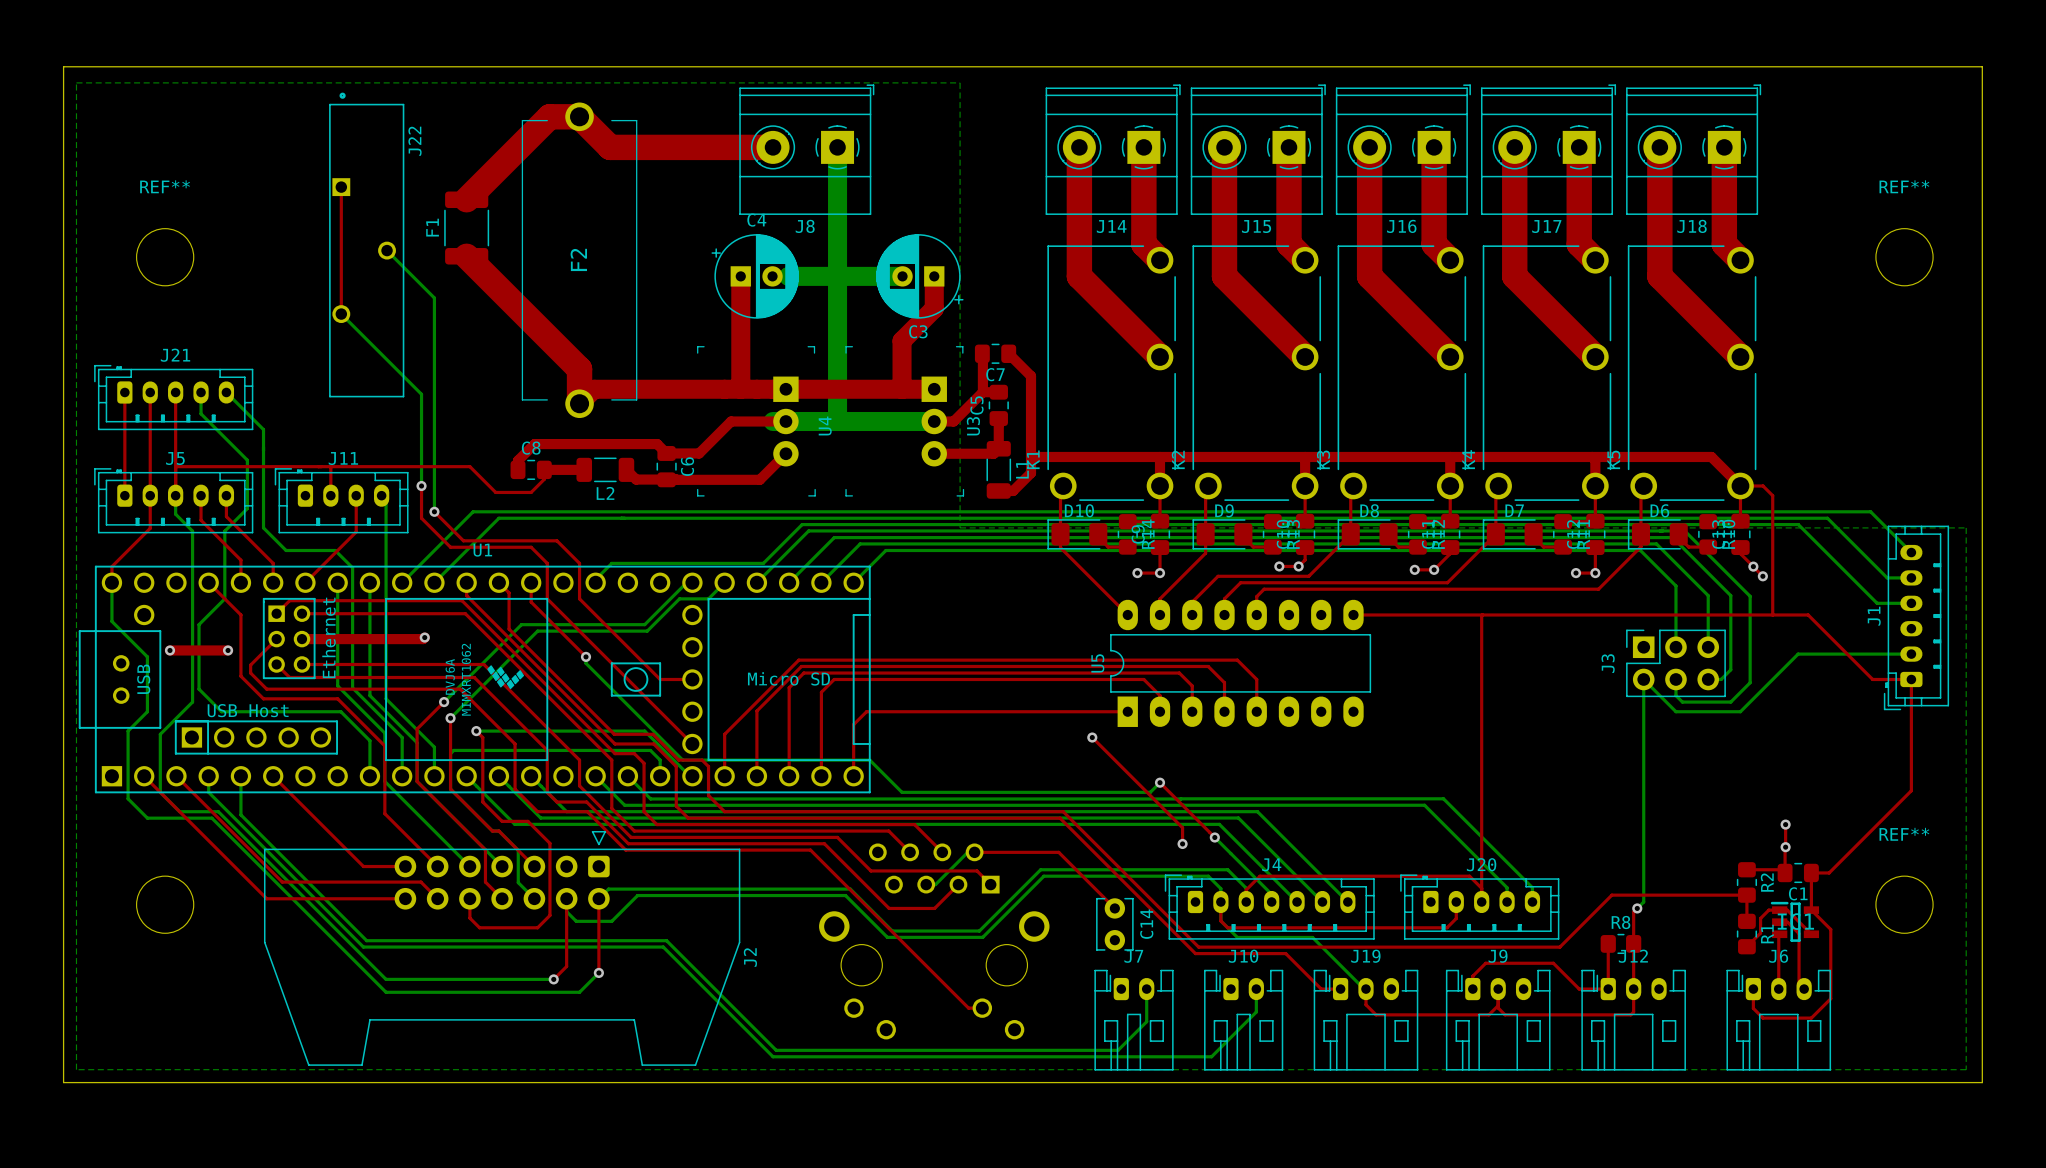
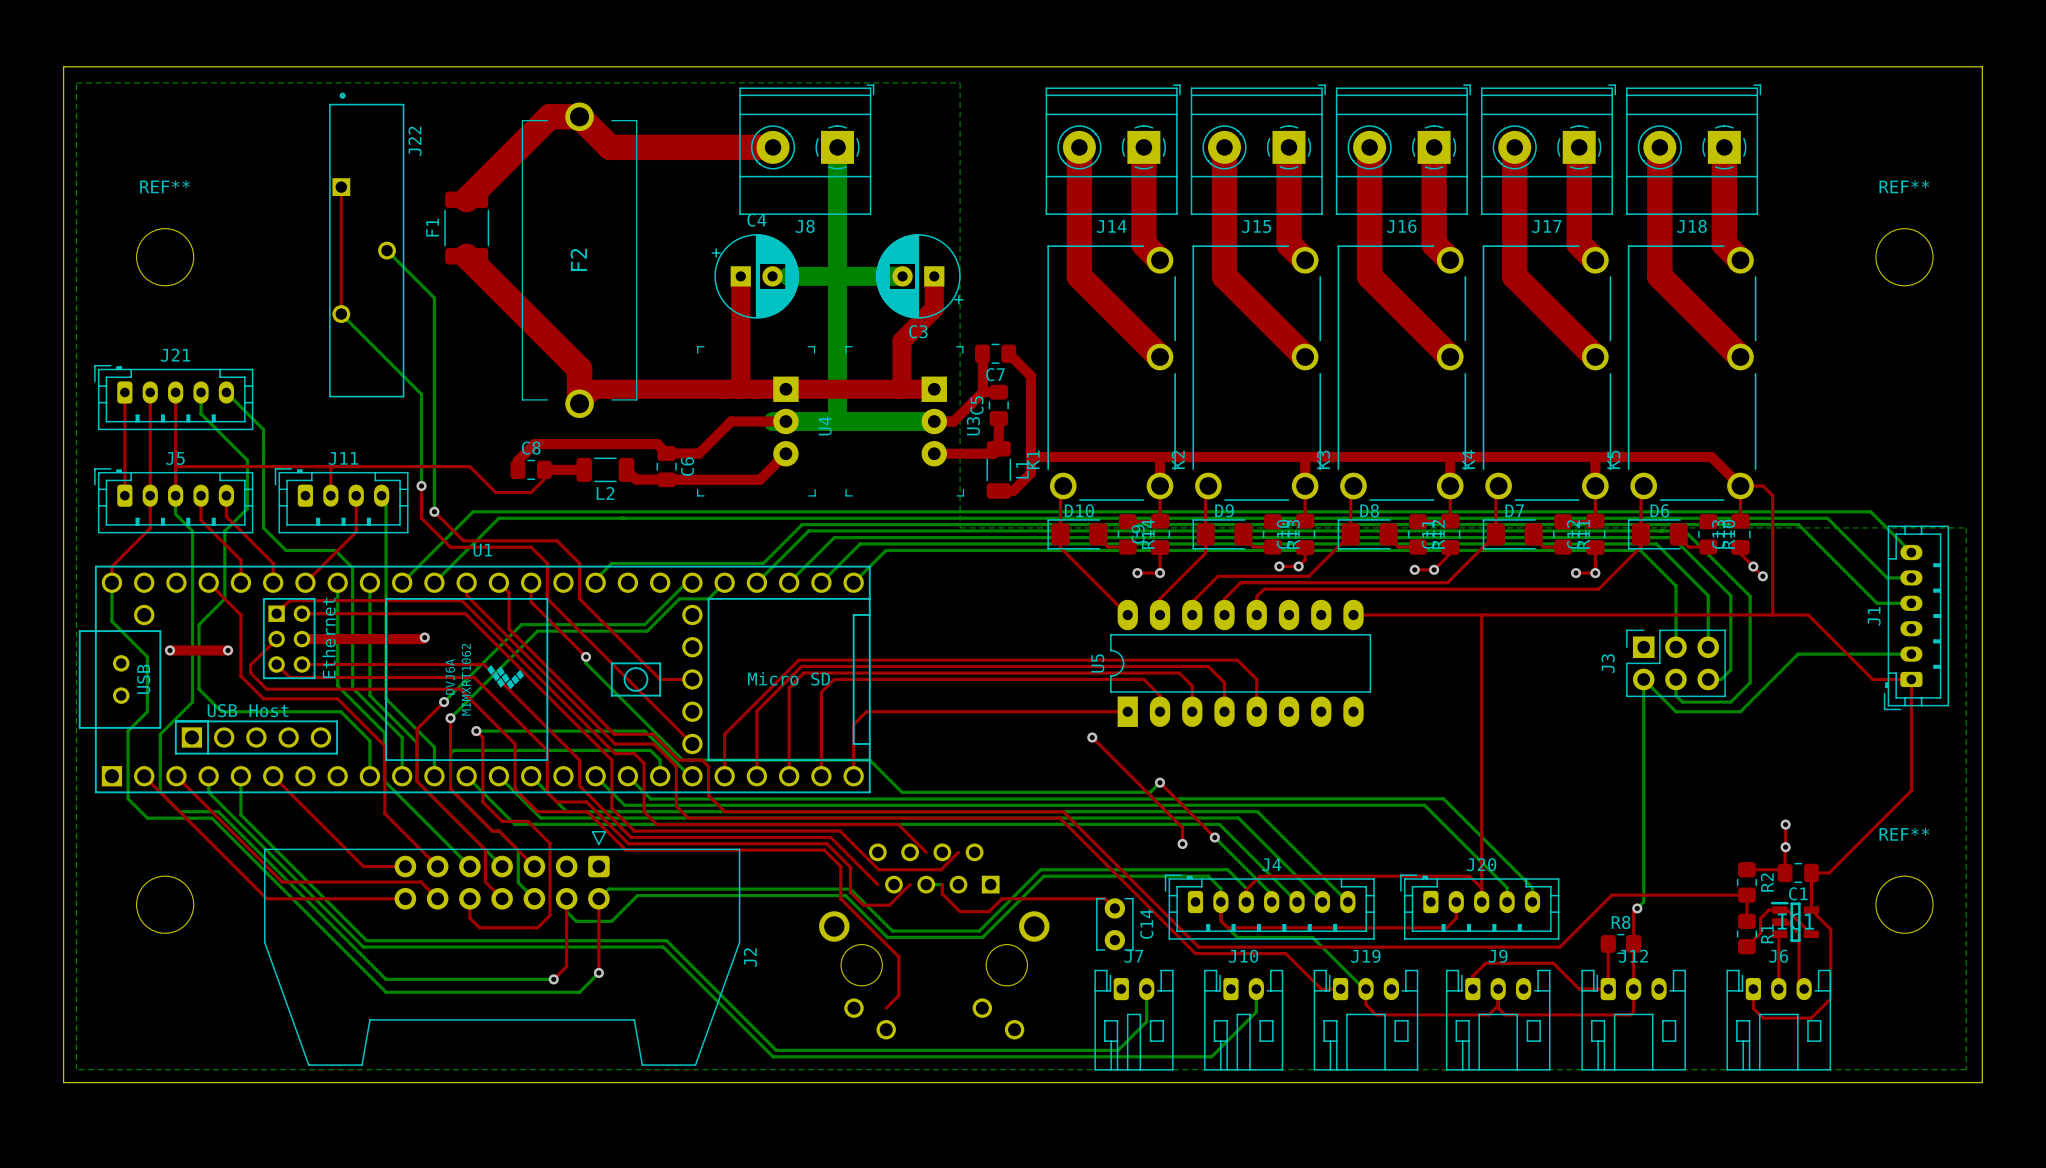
top track: (898, 824) (914, 824) (942, 852) -> (898, 824) (926, 852)
top track: (840, 831) (888, 831) (910, 852) -> (840, 831) (878, 869) (941, 869) (958, 852)
top track: (830, 837) (837, 837) (870, 870) (977, 870) (990, 884) -> (830, 837) (877, 884)
top track: (824, 843) (889, 908) (934, 908) (958, 884) -> (824, 843) (826, 843) (850, 867) (850, 892) (863, 905) (889, 905) (910, 884)
top track: (810, 850) (968, 1008) (982, 1008) -> (810, 850) (824, 850) (840, 866) (840, 898) (898, 956) (898, 995) (886, 1008)
top track: (974, 852) (1058, 852) (1105, 898) -> (942, 884) (942, 893) (960, 911) (989, 911) (1001, 898) (1105, 898)
bottom track: (974, 852) (967, 852) (935, 884) -> (942, 884) (935, 884)

